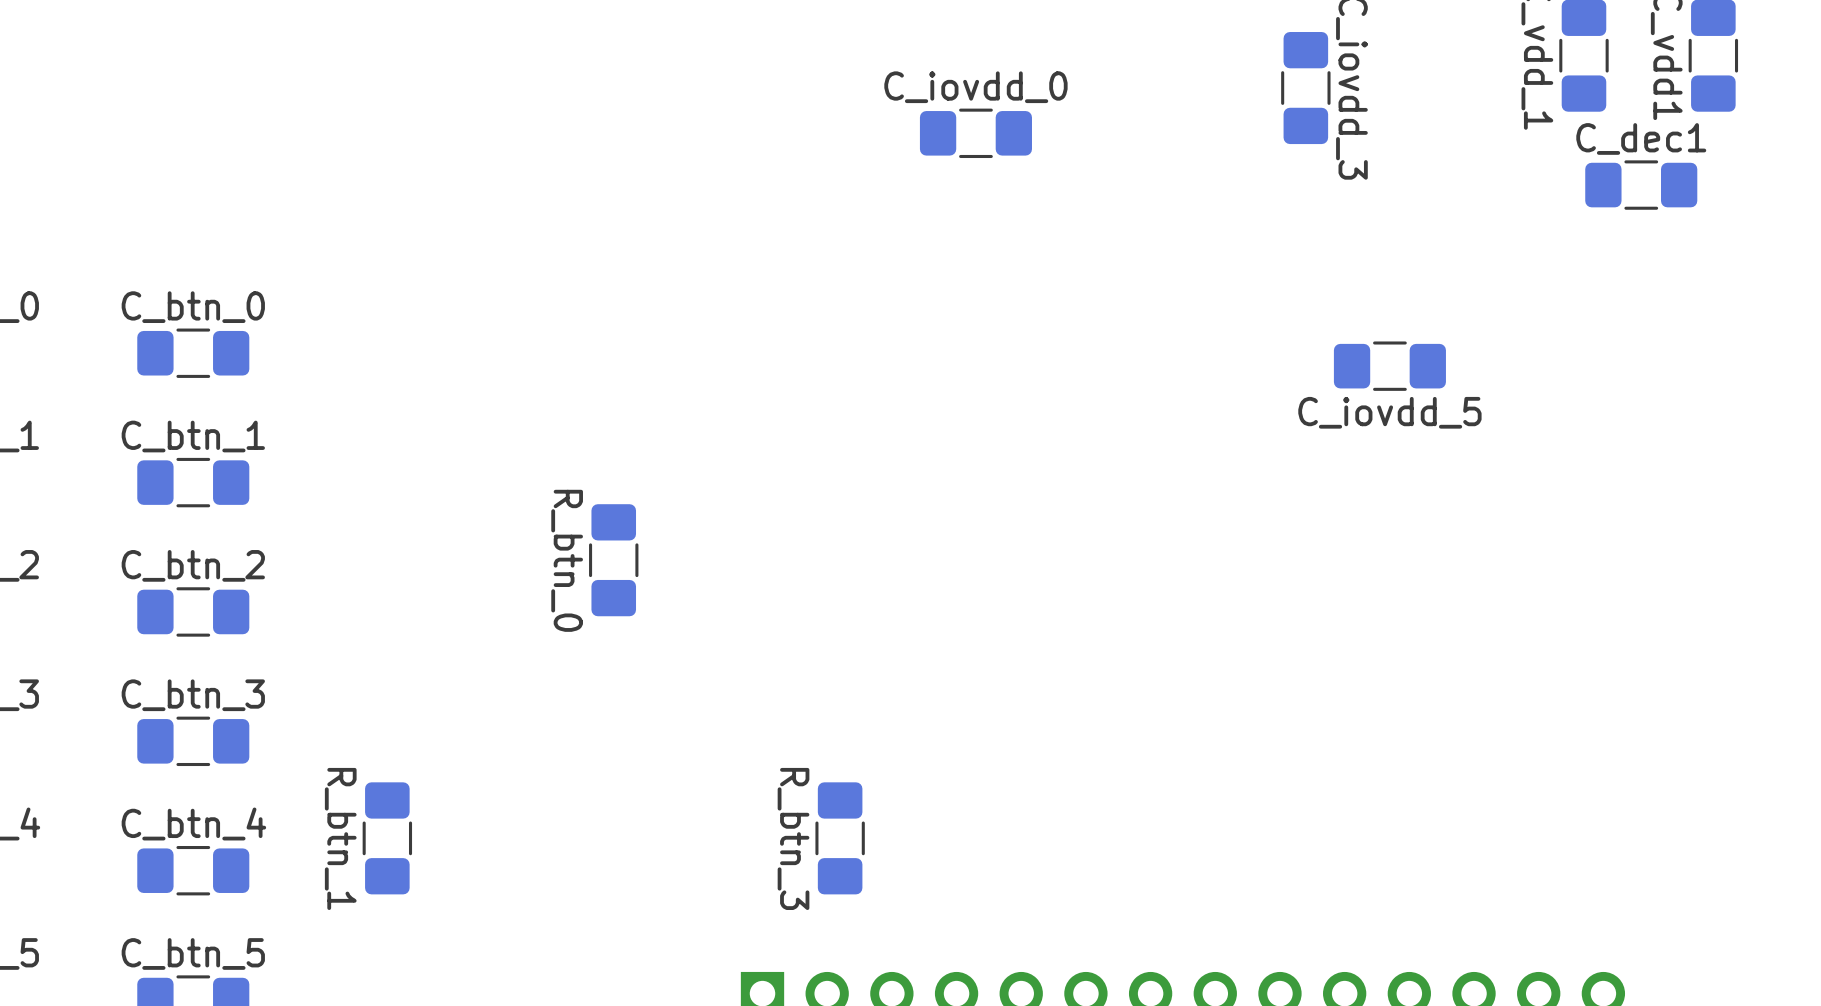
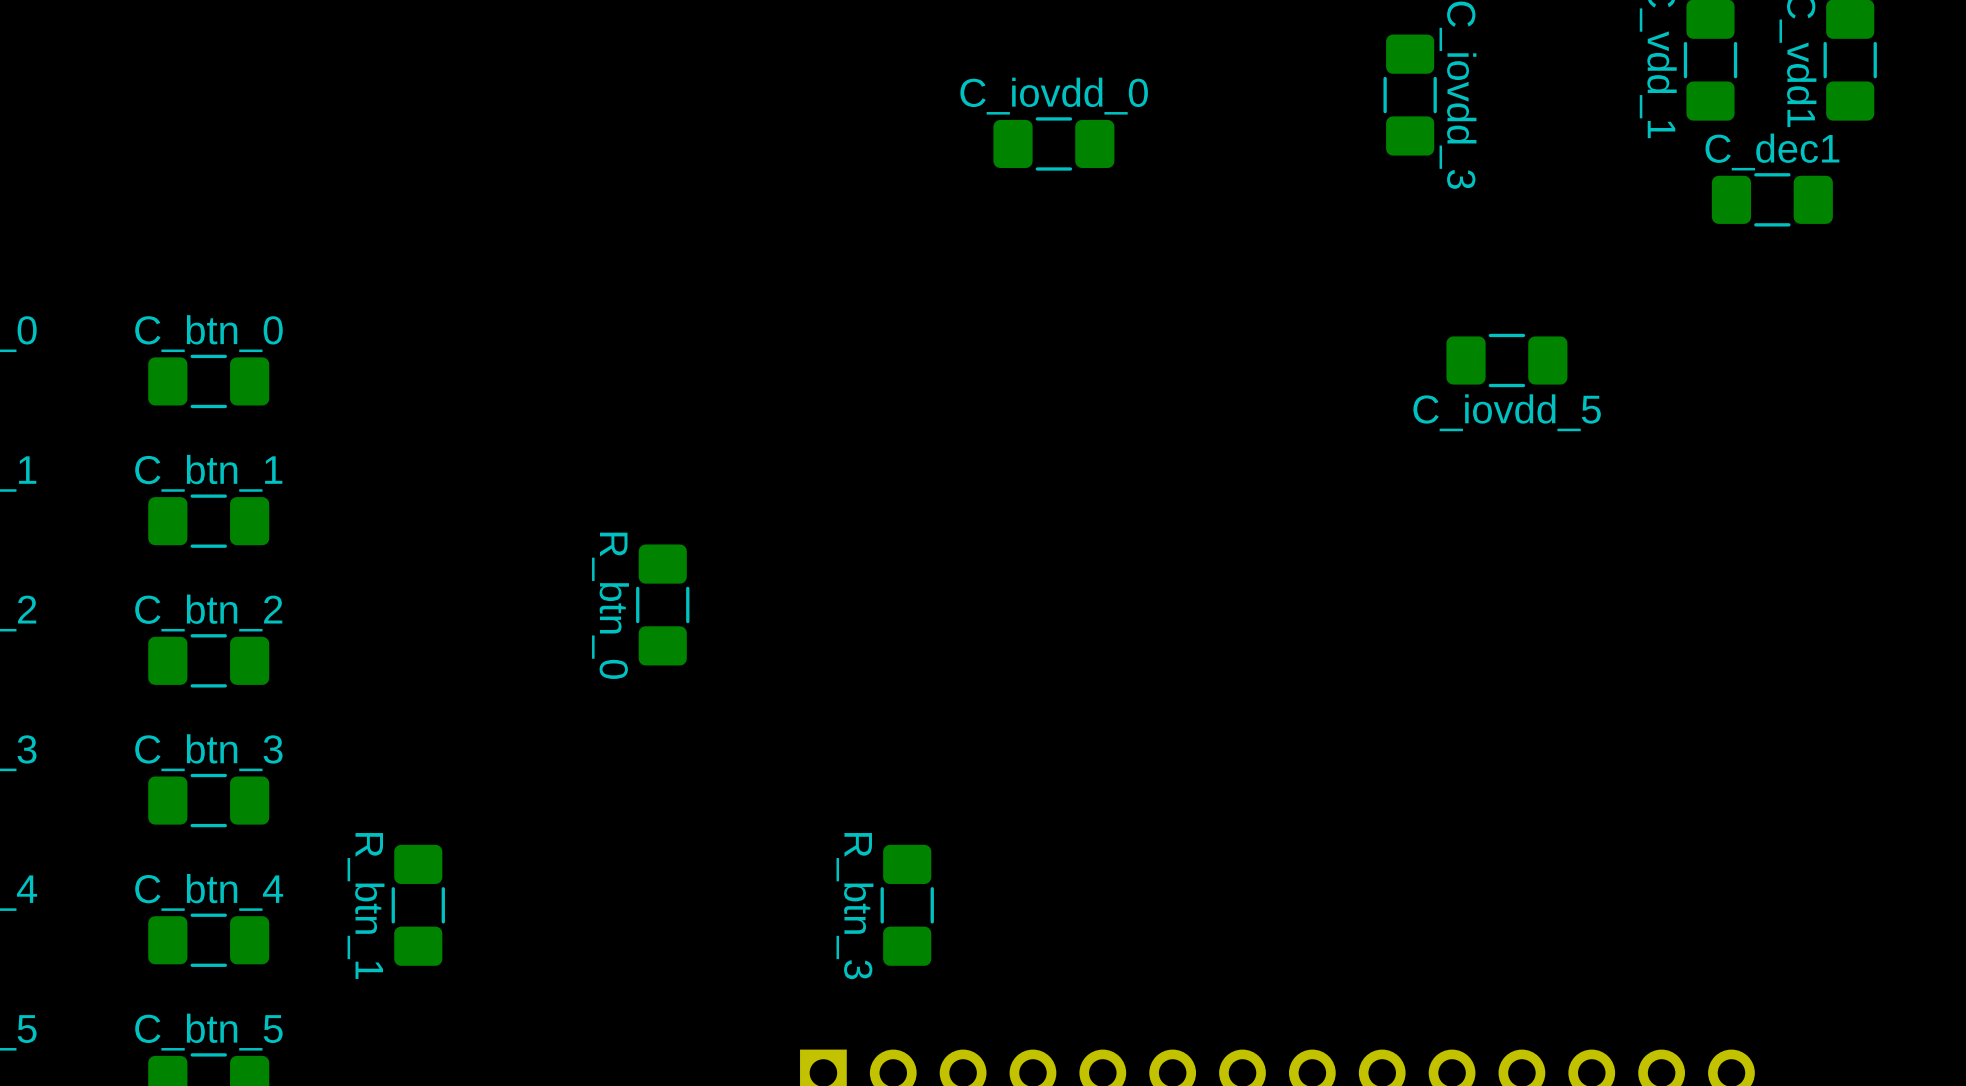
C_iovdd_5 position: (1389, 366) -> (1506, 360)

